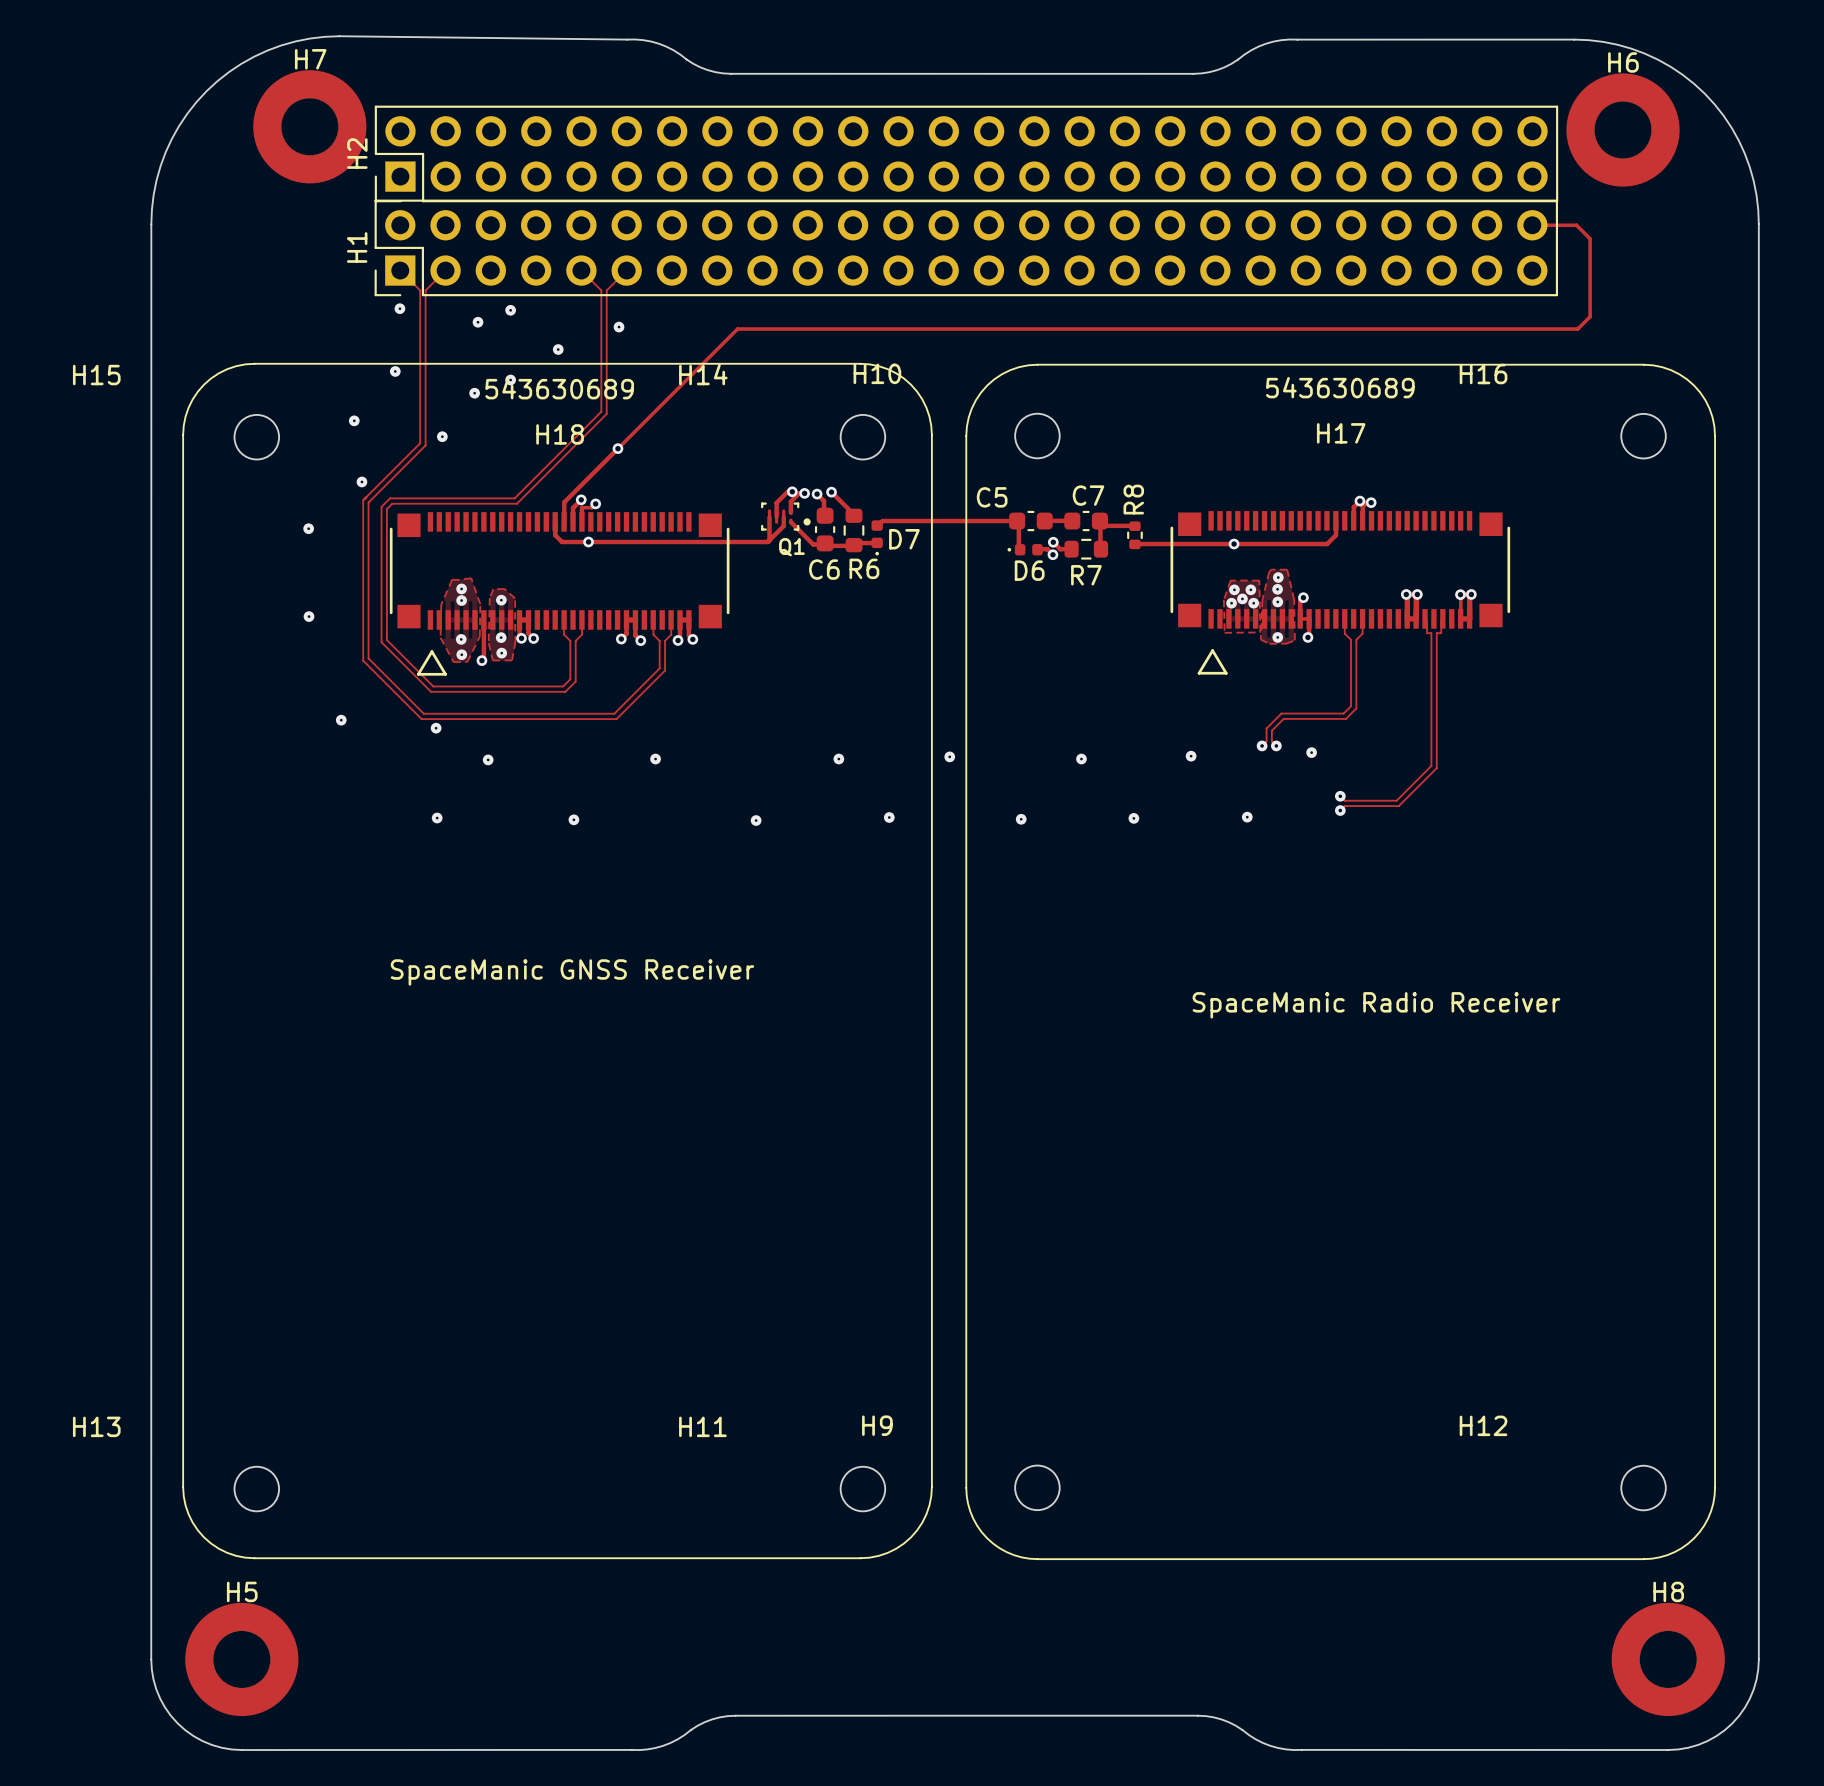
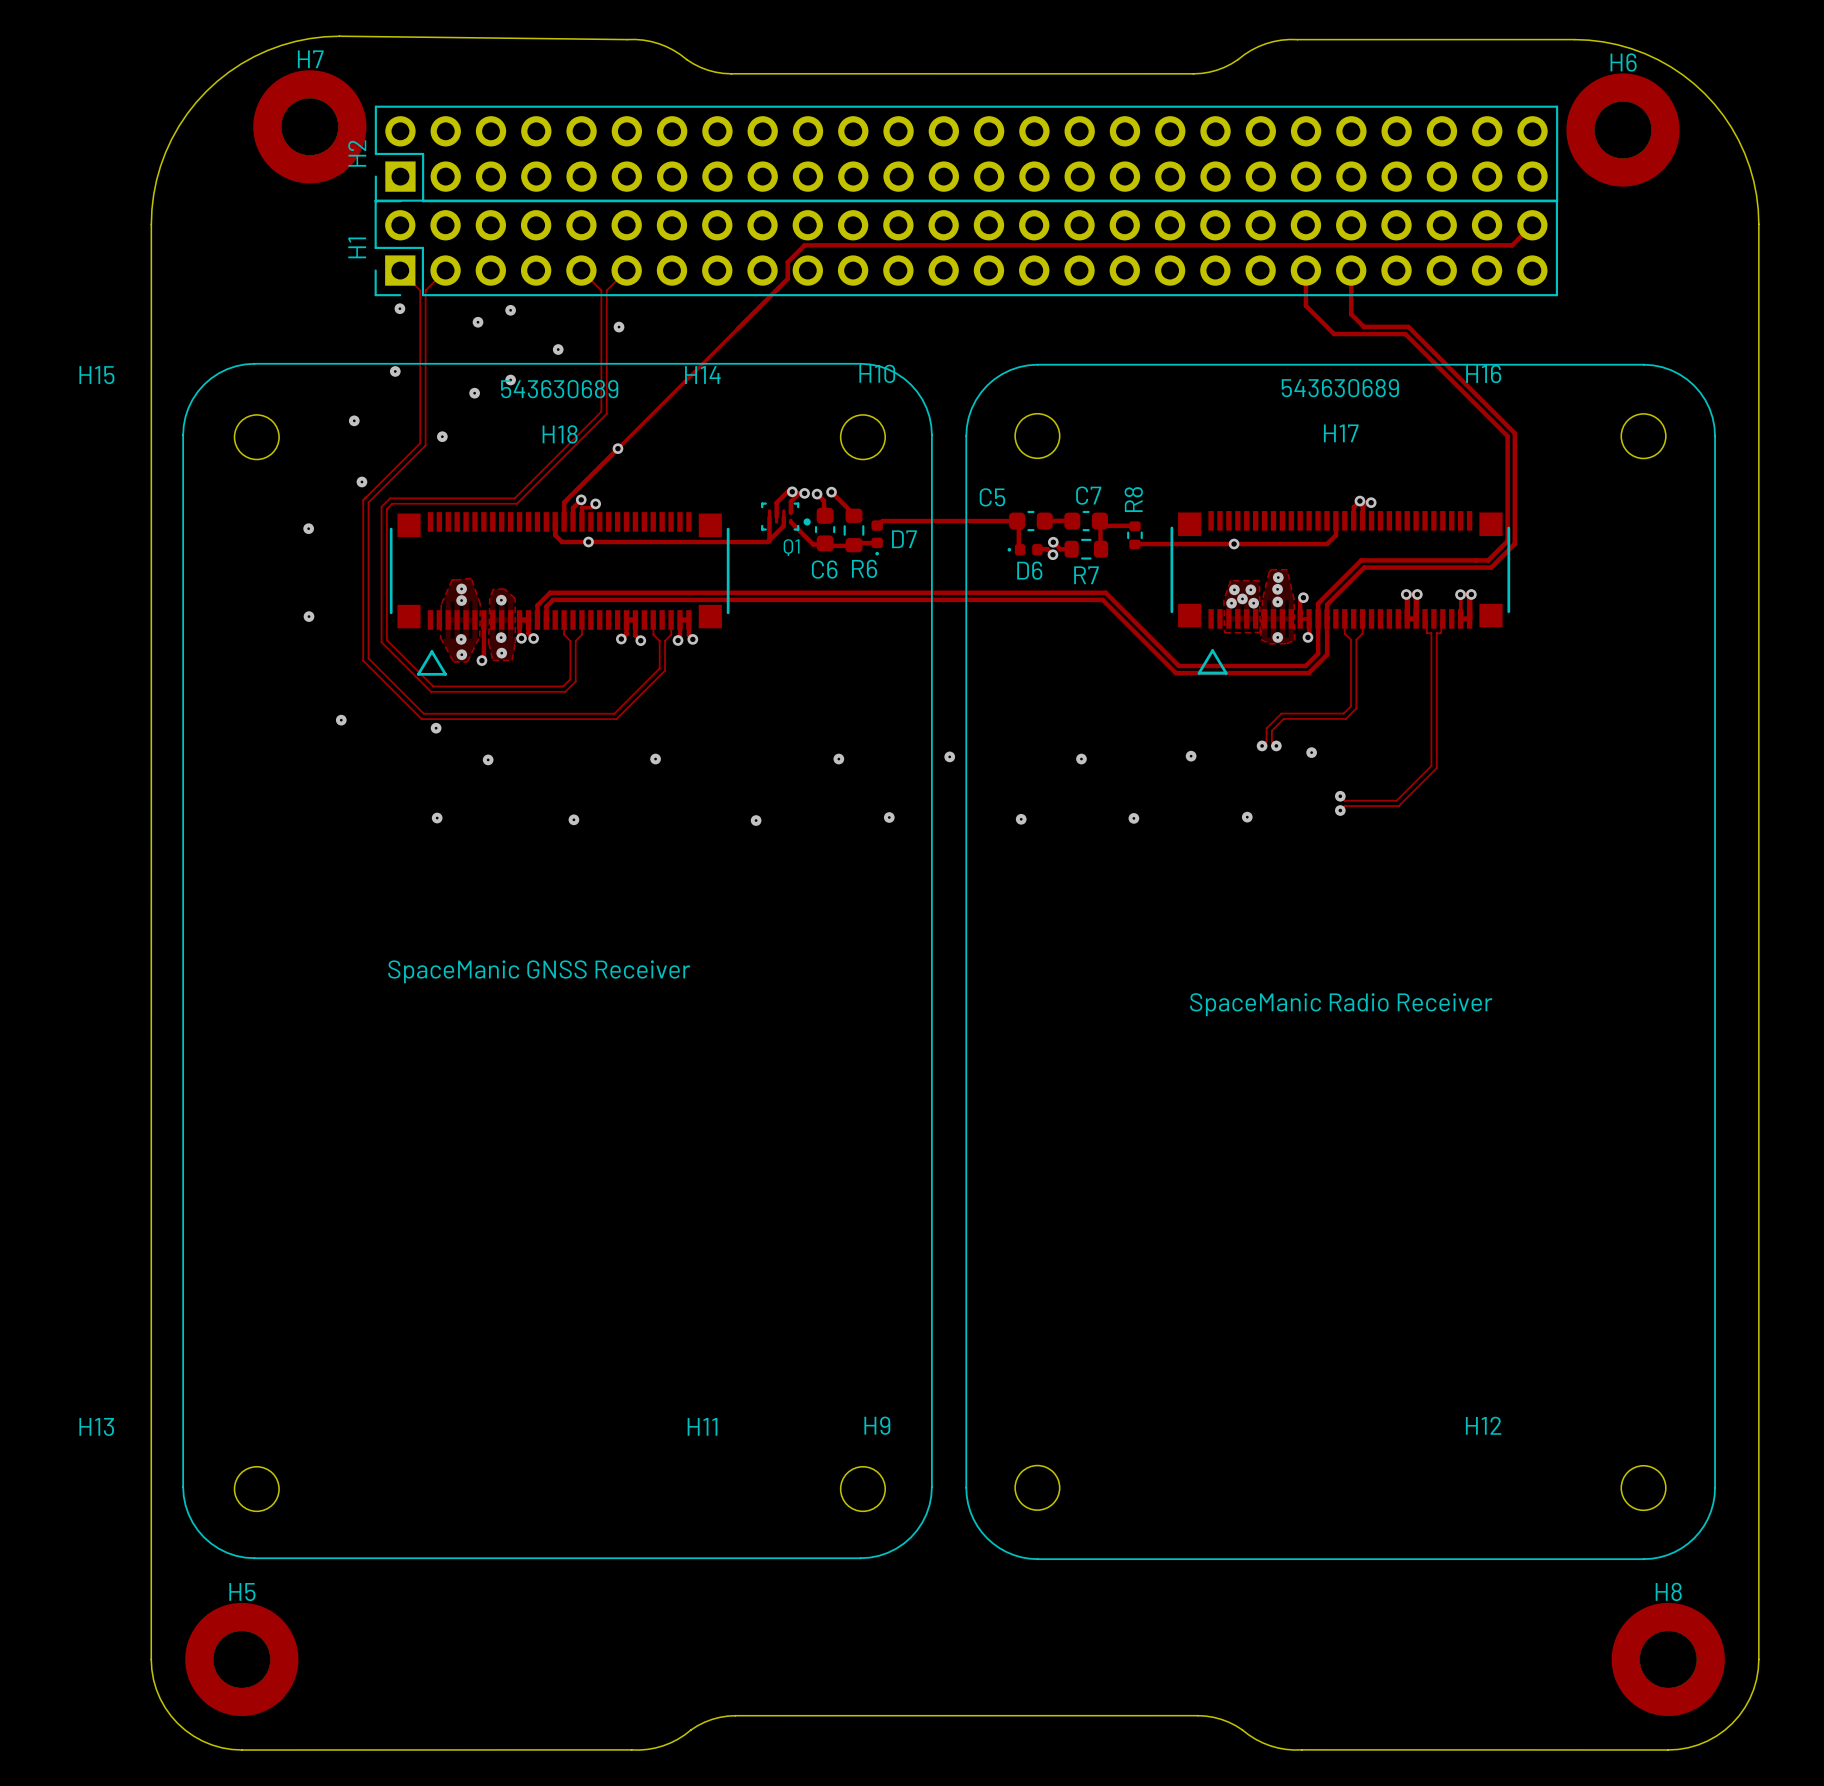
track: (1532, 225) (1576, 225) (1590, 238) (1590, 316) (1577, 329) (737, 329) -> (1532, 225) (1512, 245) (804, 245) (787, 262) (787, 278) (737, 329)
track: none -> (1305, 270) (1305, 305) (1334, 334) (1405, 334) (1507, 436) (1507, 540) (1488, 560) (1361, 560) (1318, 603) (1318, 653) (1305, 665) (1178, 665) (1105, 592) (550, 592) (537, 605) (537, 619)
track: none -> (1351, 270) (1351, 314) (1363, 326) (1408, 326) (1514, 433) (1514, 543) (1491, 567) (1364, 567) (1327, 604) (1327, 654) (1308, 673) (1175, 673) (1102, 599) (553, 599) (546, 606) (546, 619)

